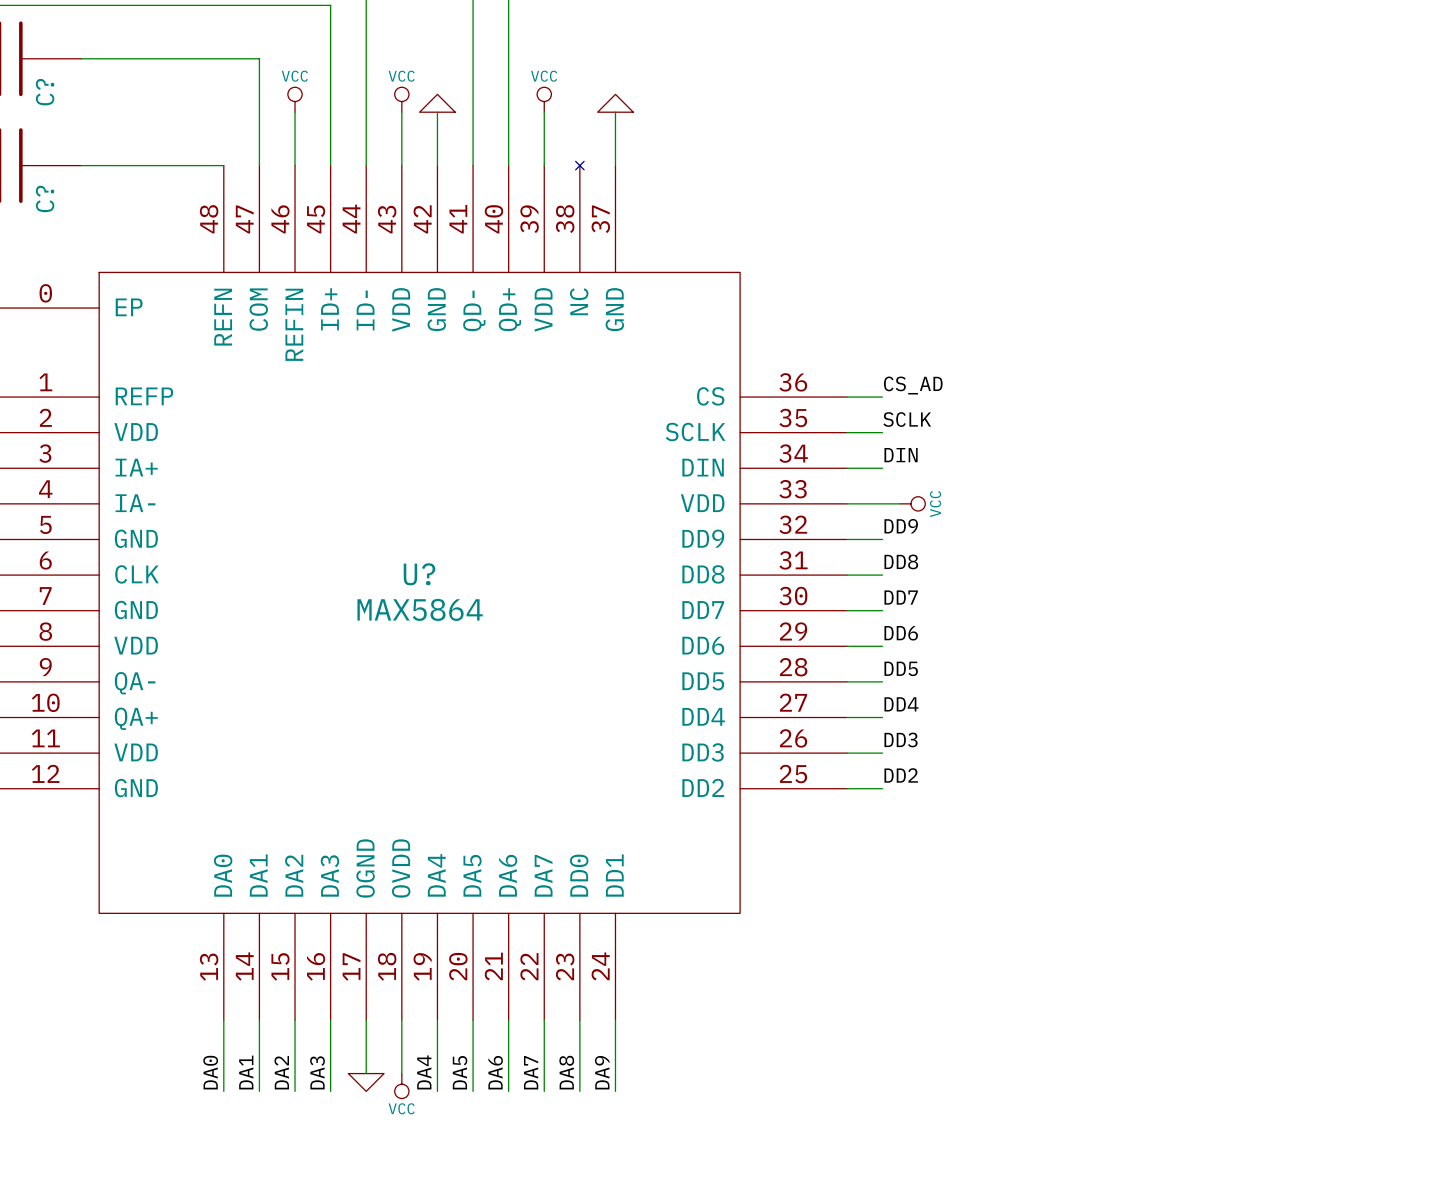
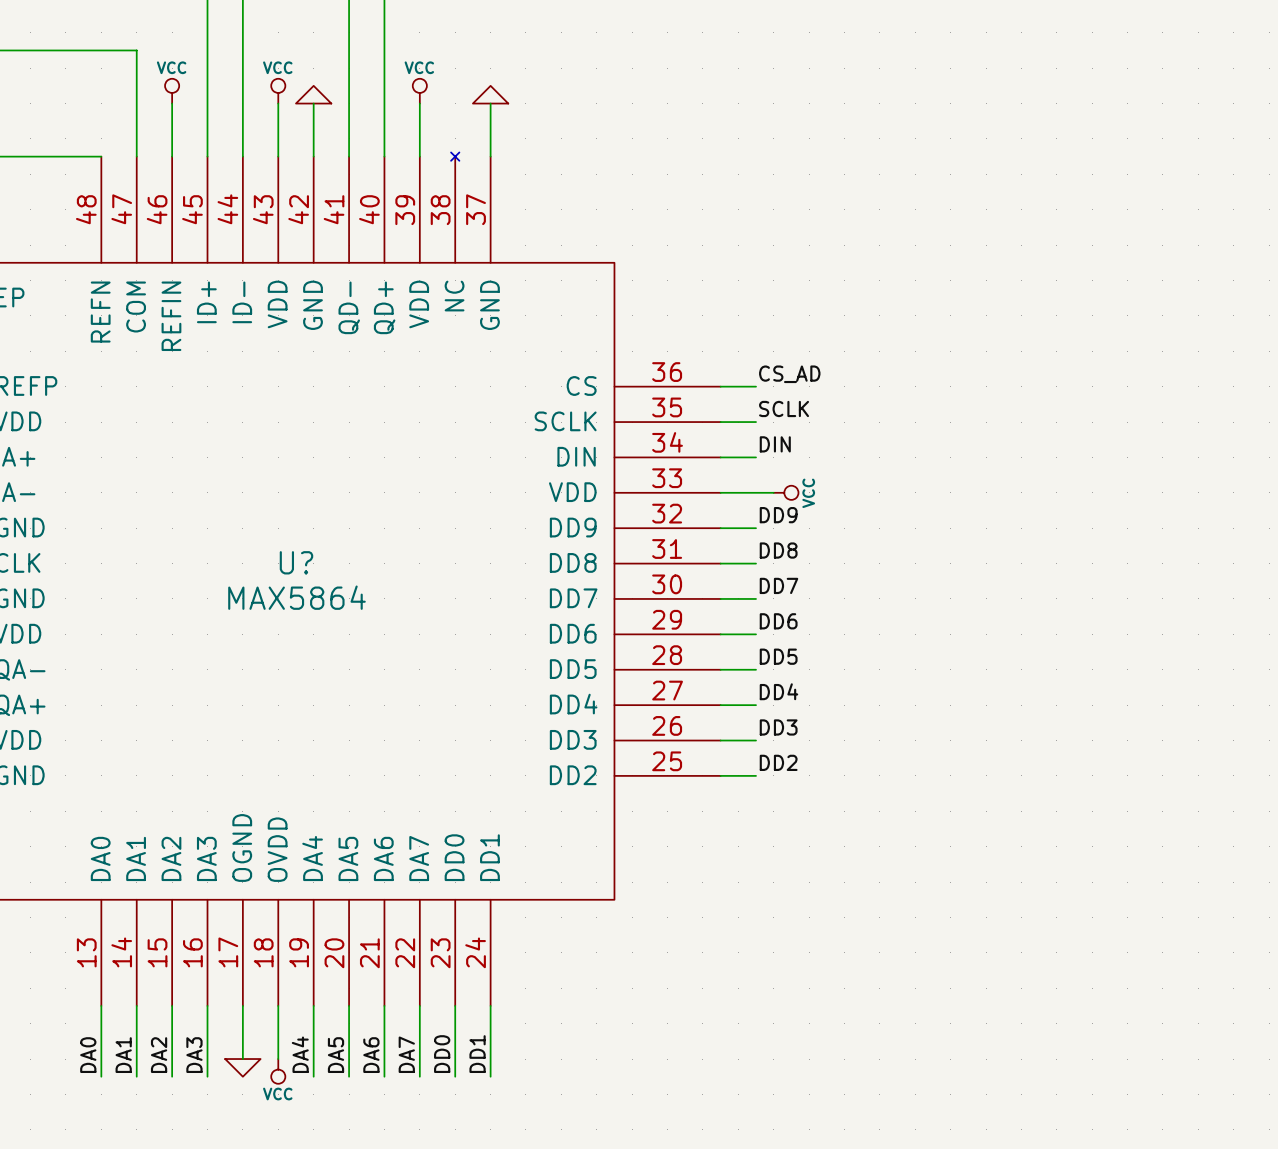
label: DA8 (566, 1072) -> DD0 (442, 1054)
label: DA9 (602, 1072) -> DD1 (477, 1054)

